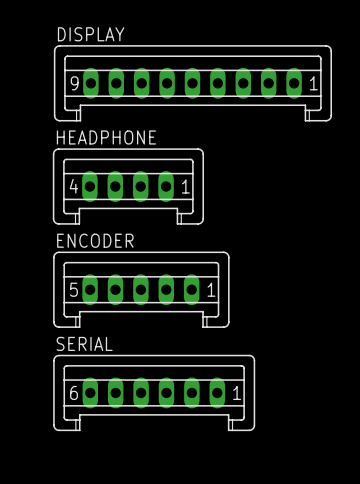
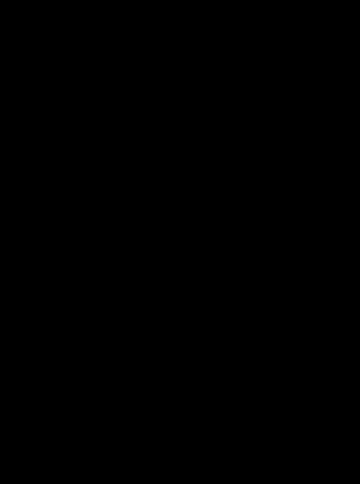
DISPLAY: (192, 83) -> none
HEADPHONE: (128, 186) -> none
ENCODER: (141, 289) -> none
SERIAL: (154, 392) -> none

